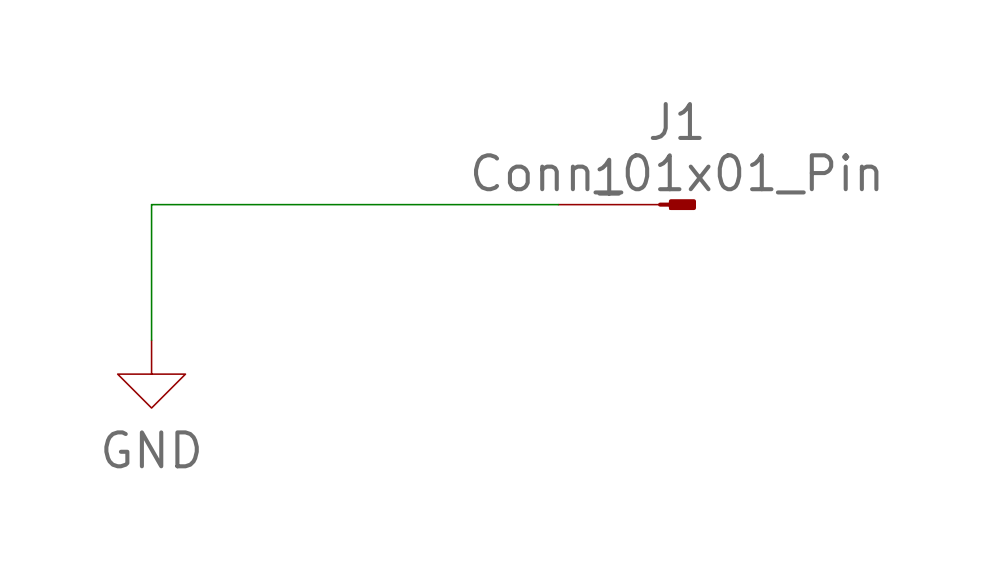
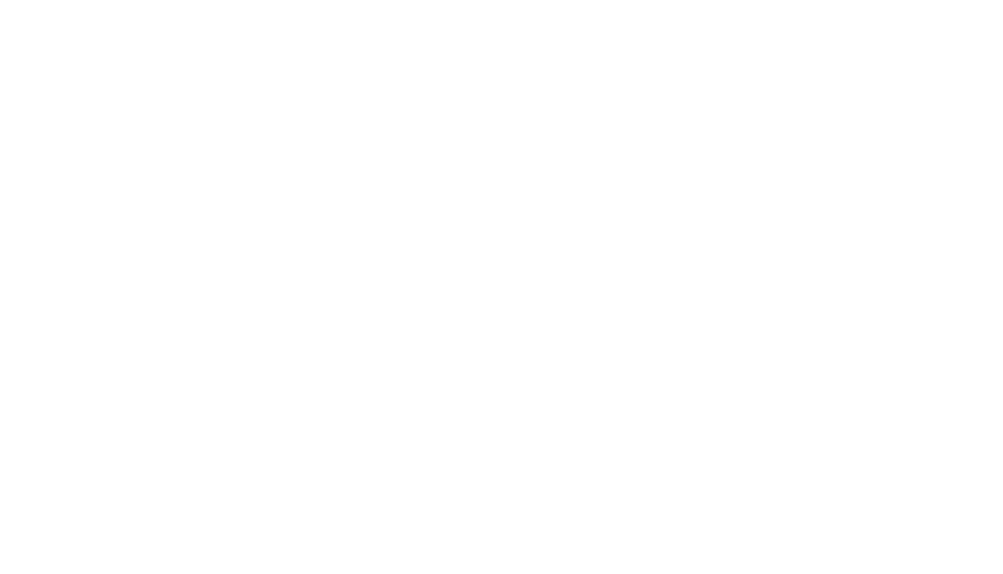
wire: (558, 204) (151, 204) (151, 340) -> none
J1: Conn_01x01_Pin (627, 204) -> none
power symbol: GND (151, 374) -> none

